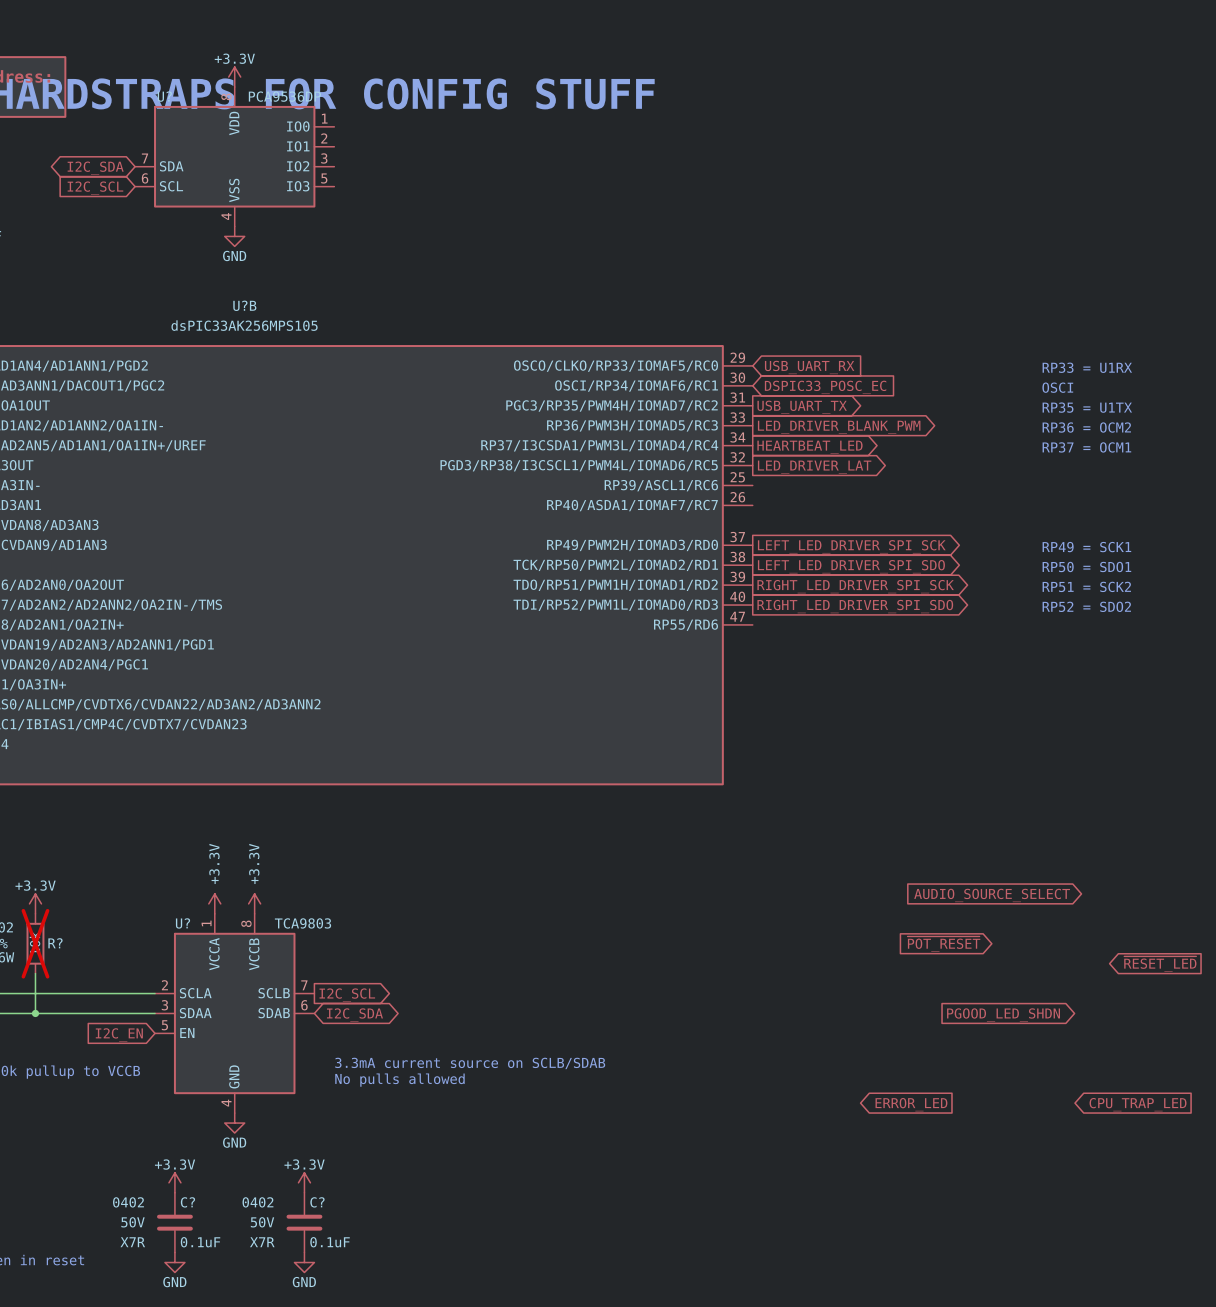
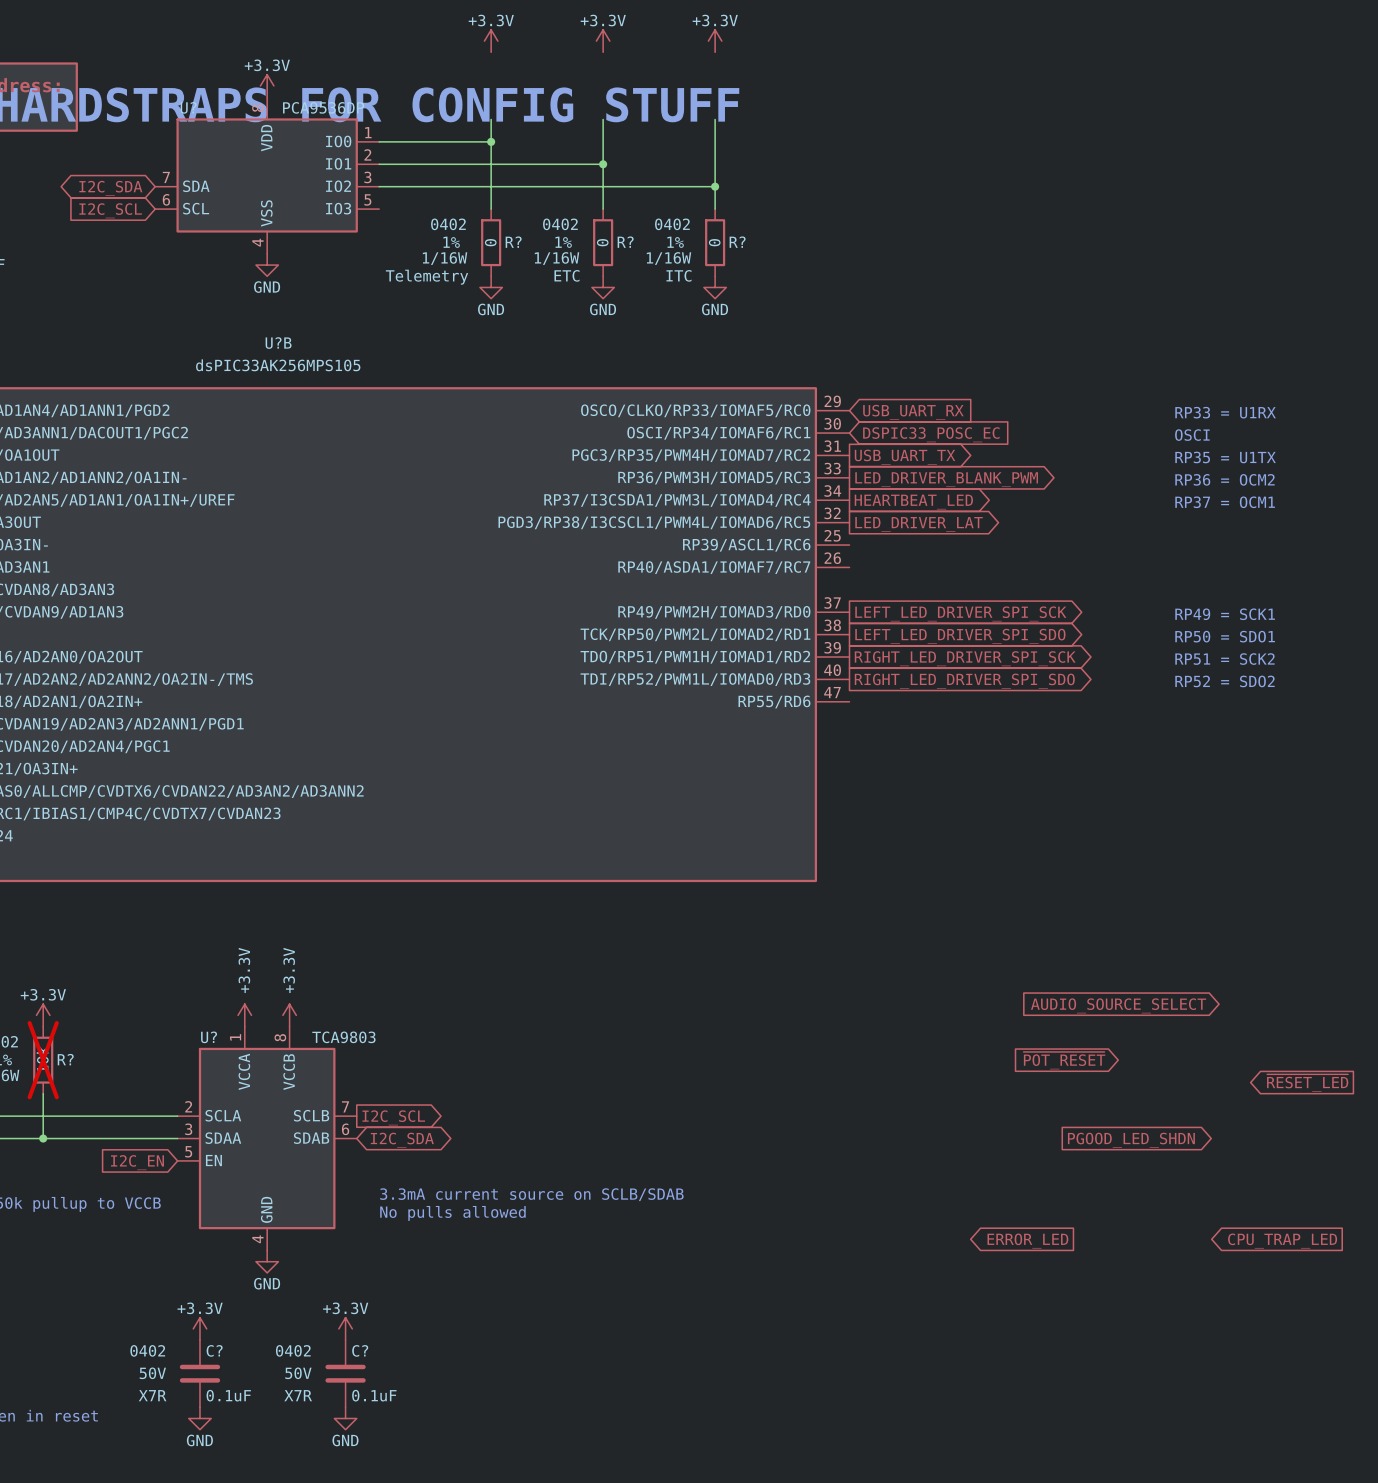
power symbol: none -> +3.3V (491, 41)
power symbol: none -> +3.3V (603, 41)
power symbol: none -> +3.3V (715, 41)
wire: none -> (491, 119) (491, 209)
wire: none -> (603, 119) (603, 209)
wire: none -> (715, 119) (715, 209)
wire: none -> (379, 141) (491, 141)
junction: none -> (491, 141)
wire: none -> (379, 164) (603, 164)
junction: none -> (603, 164)
wire: none -> (379, 186) (715, 186)
junction: none -> (715, 186)
R?: none -> 0 (491, 242)
R?: none -> 0 (603, 242)
R?: none -> 0 (715, 242)
power symbol: none -> GND (491, 287)
power symbol: none -> GND (603, 287)
power symbol: none -> GND (715, 287)

